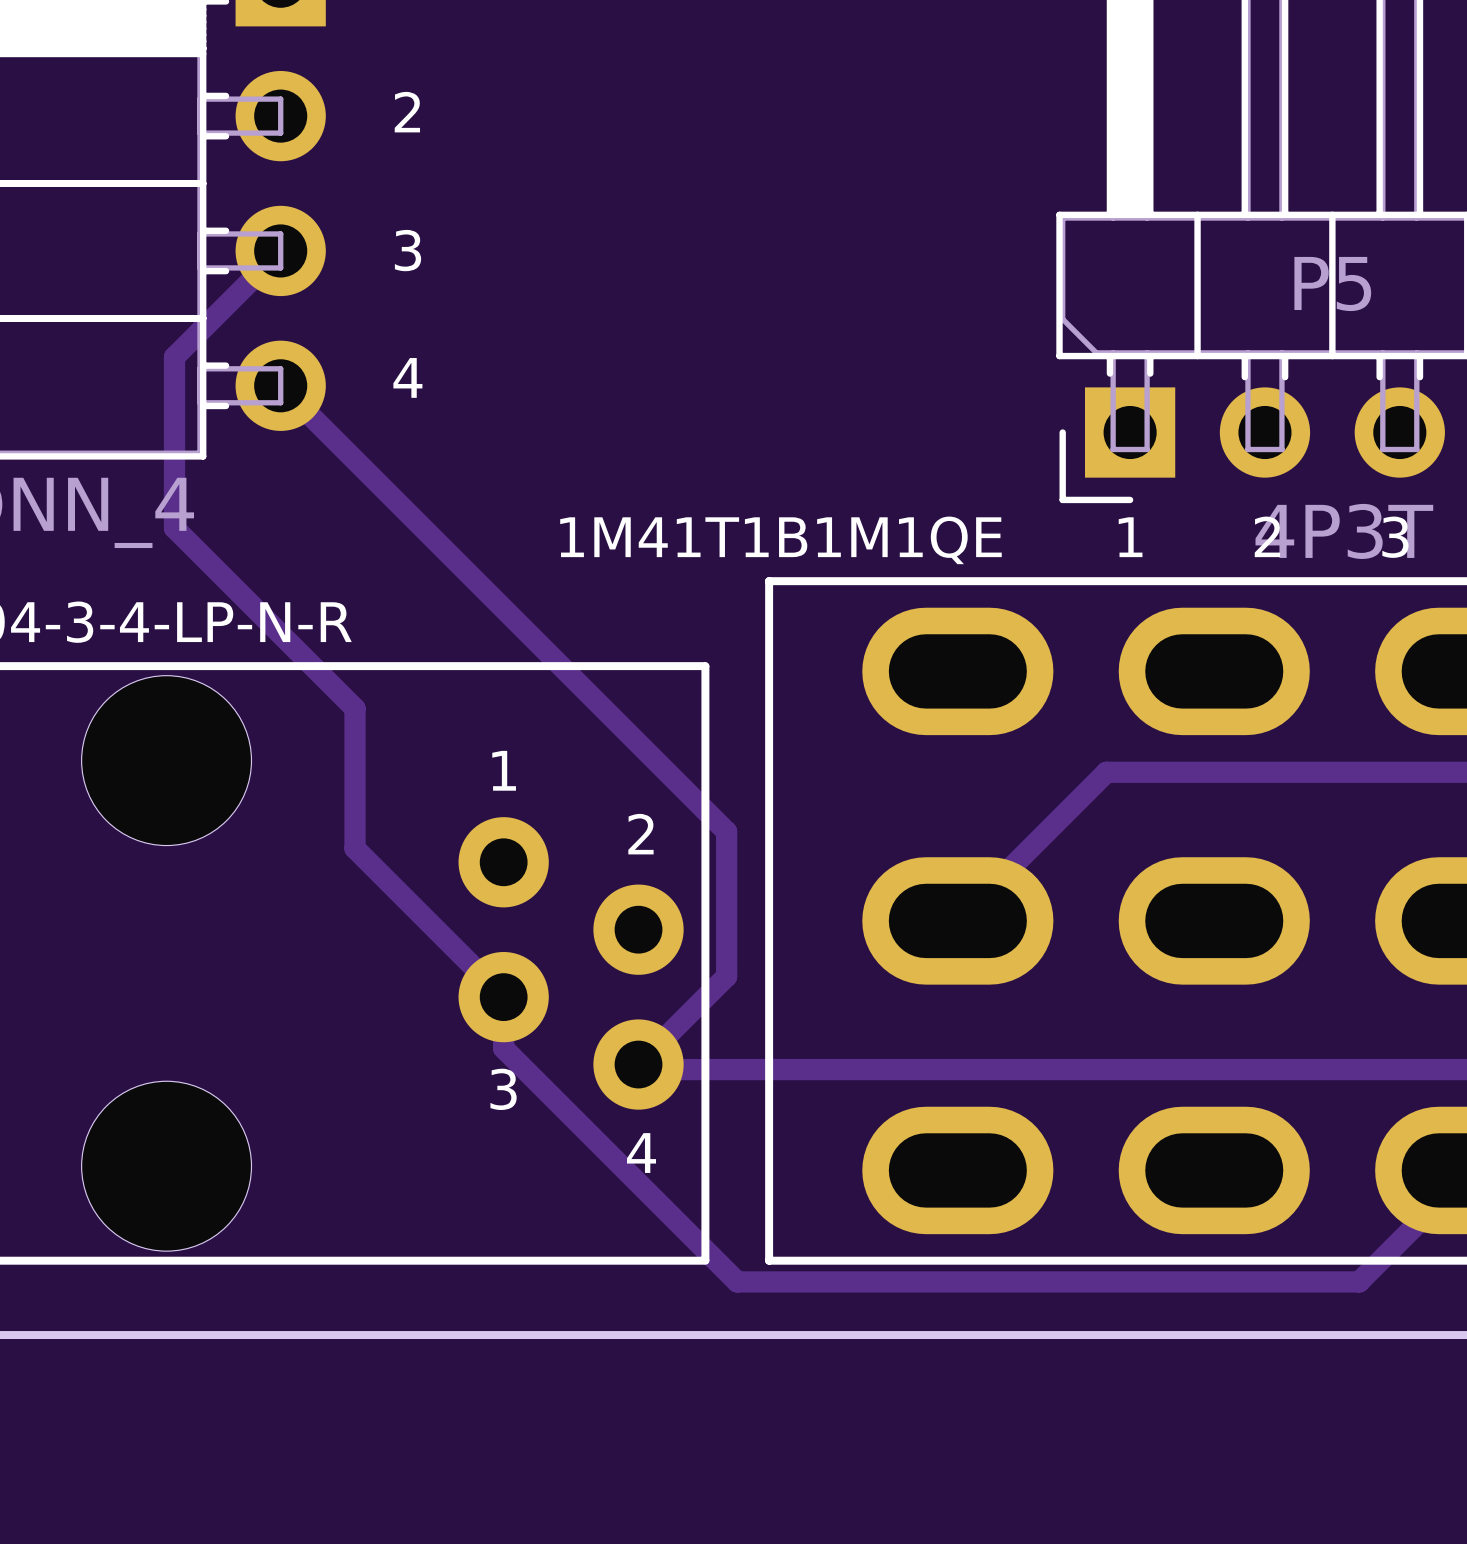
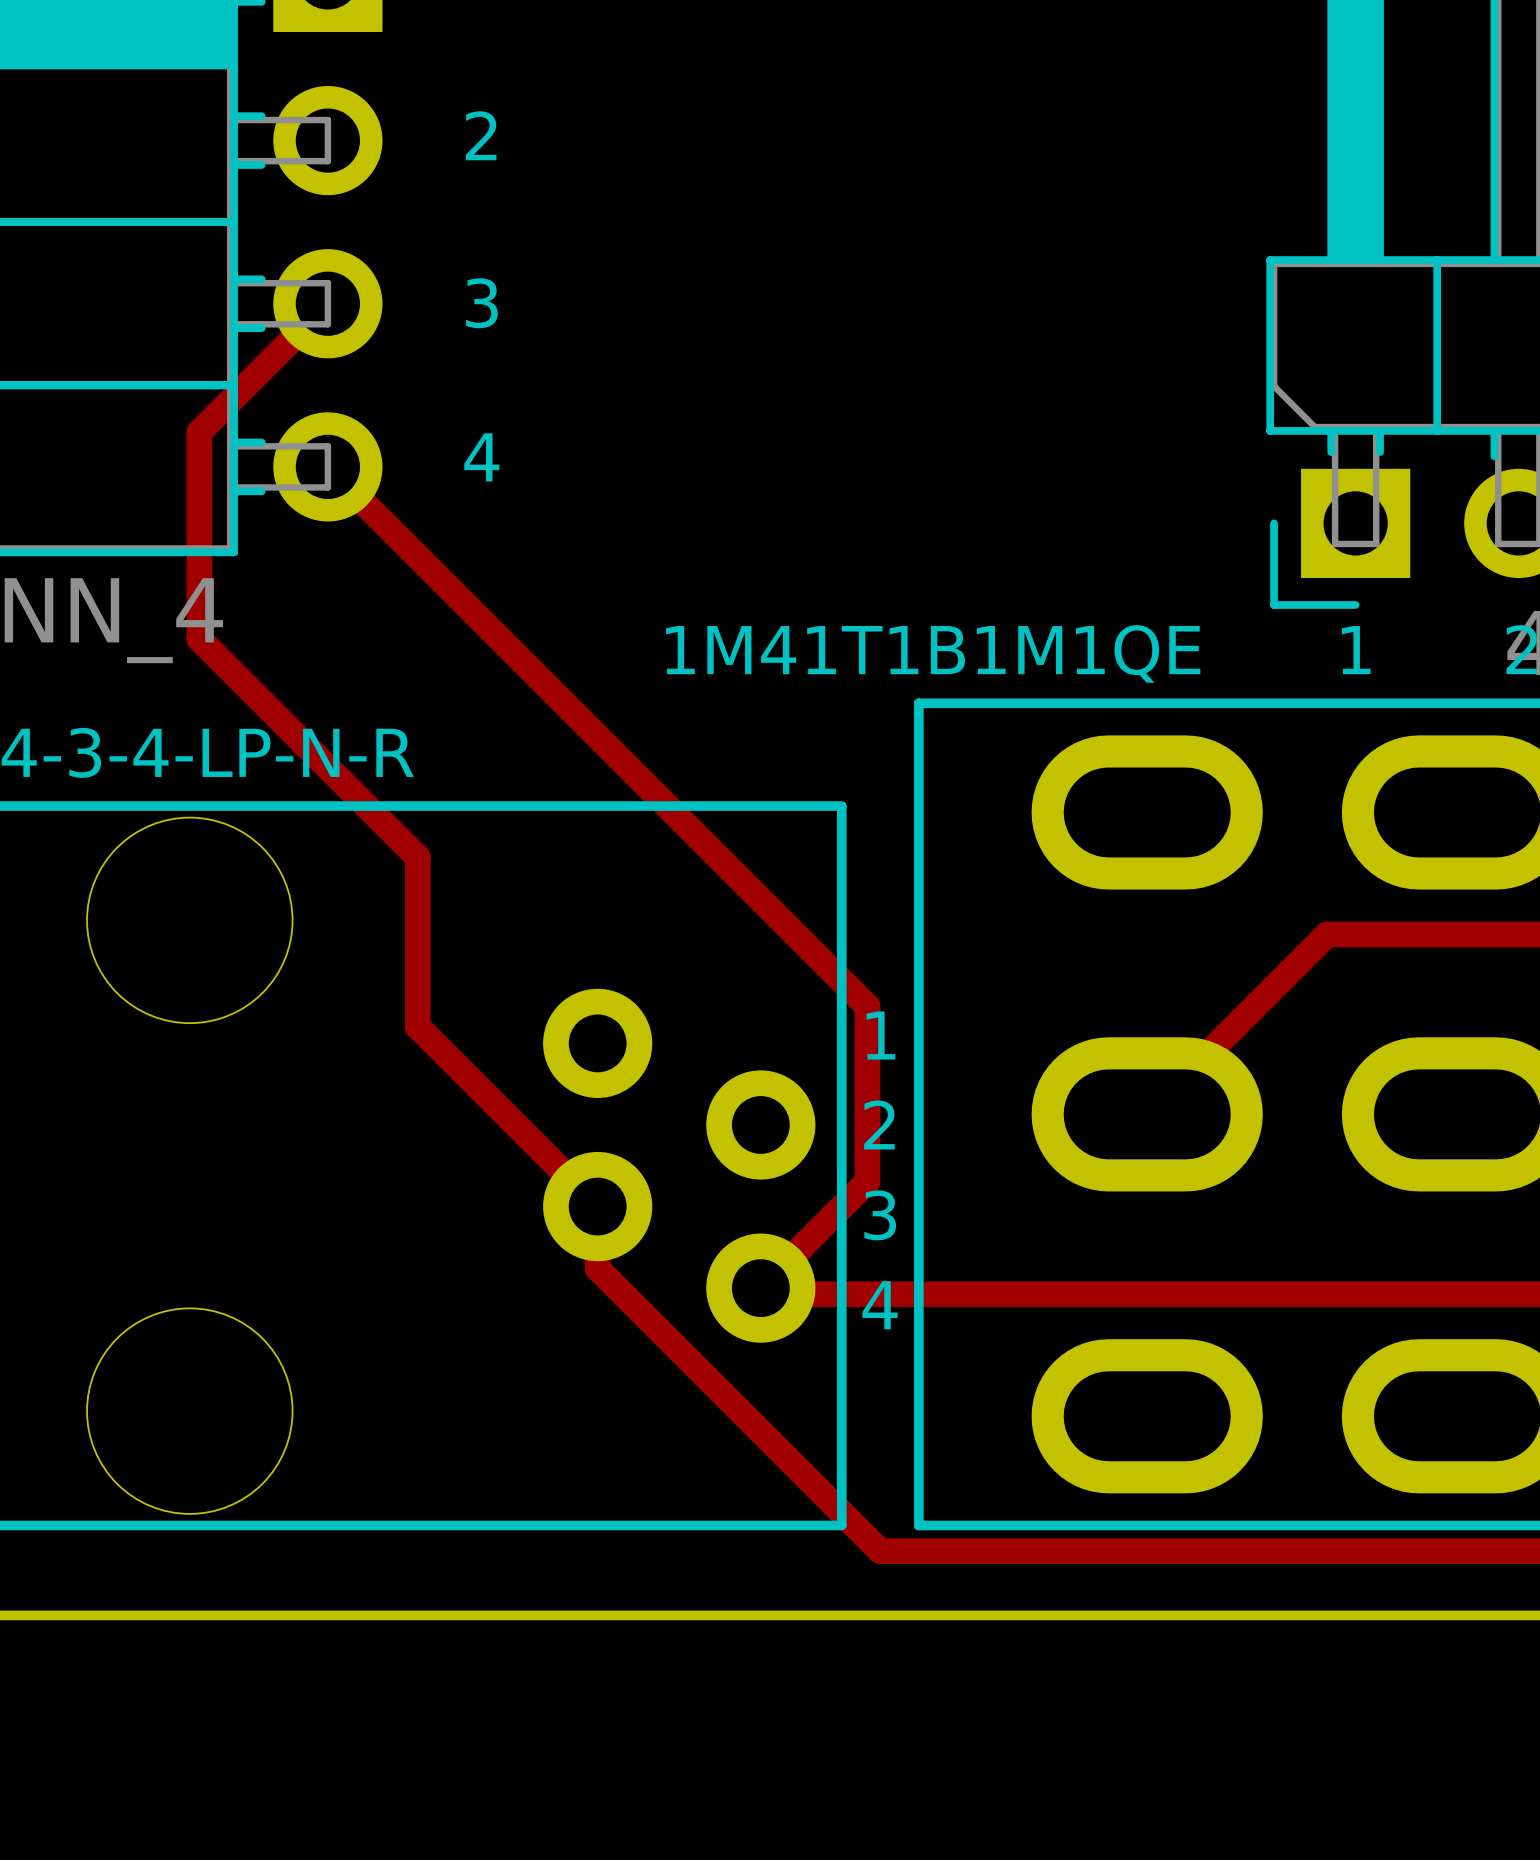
text position: 1 (504, 770) -> 1 (880, 1035)
text position: 2 (640, 834) -> 2 (879, 1124)
text position: 3 (503, 1089) -> 3 (880, 1215)
text position: 4 (641, 1153) -> 4 (880, 1305)

